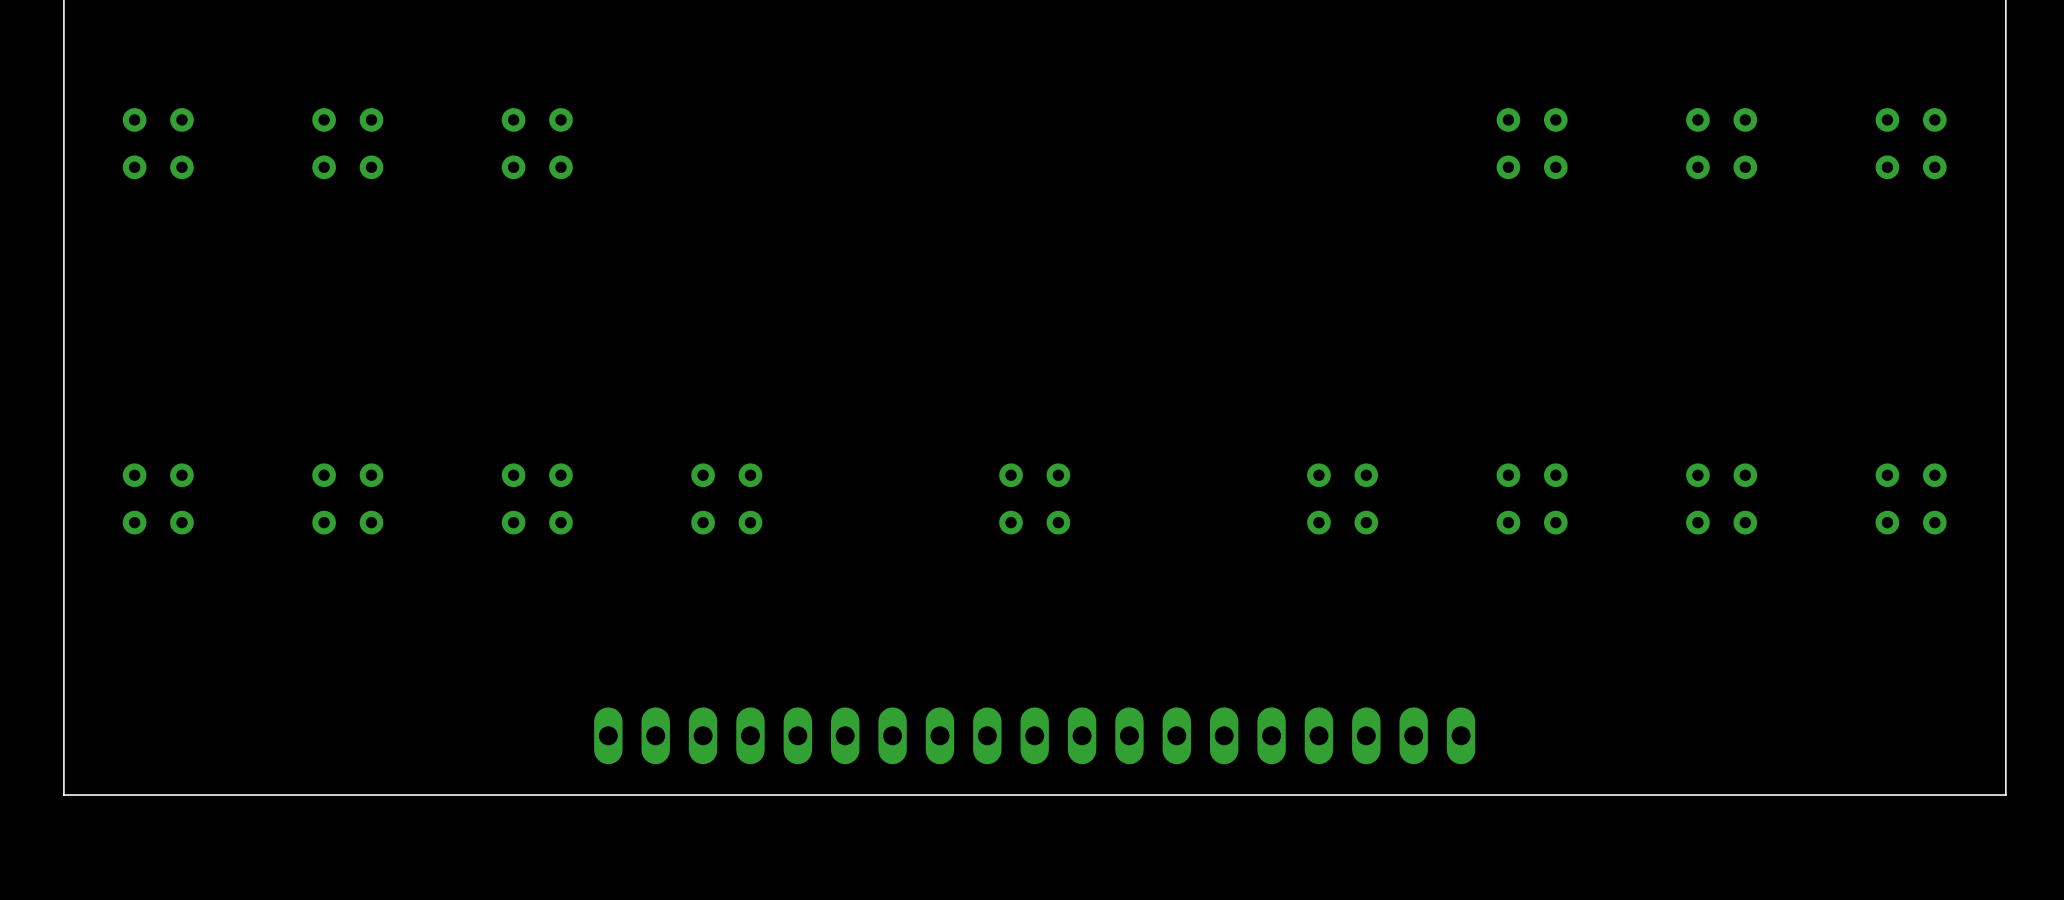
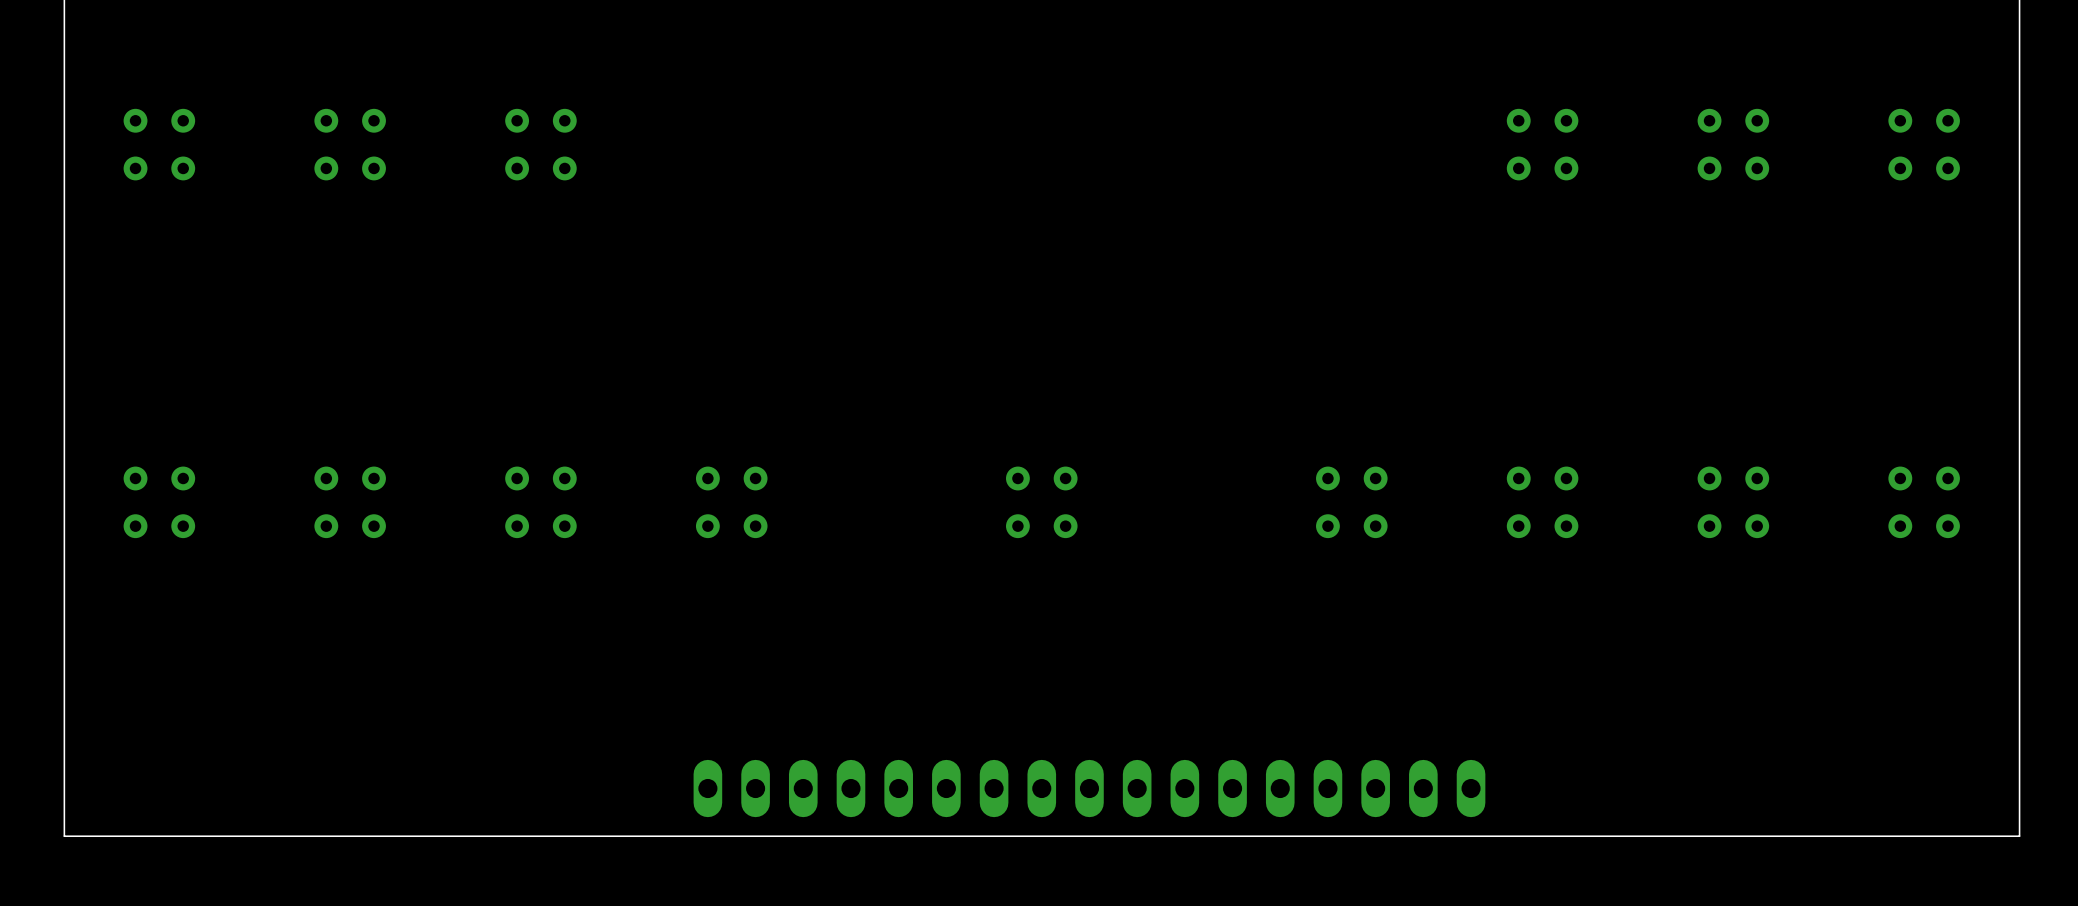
part: (1034, 735) -> none
part: none -> (1089, 788)
board edge: (2005, 795) (63, 795) -> (2019, 800) (2019, 836) (64, 836) (64, 800)

